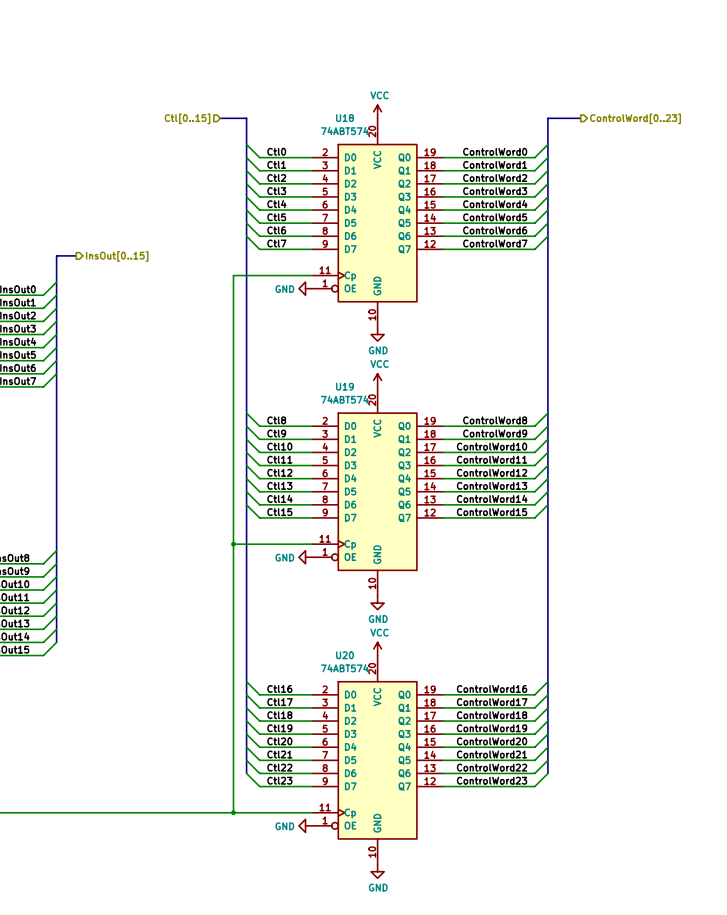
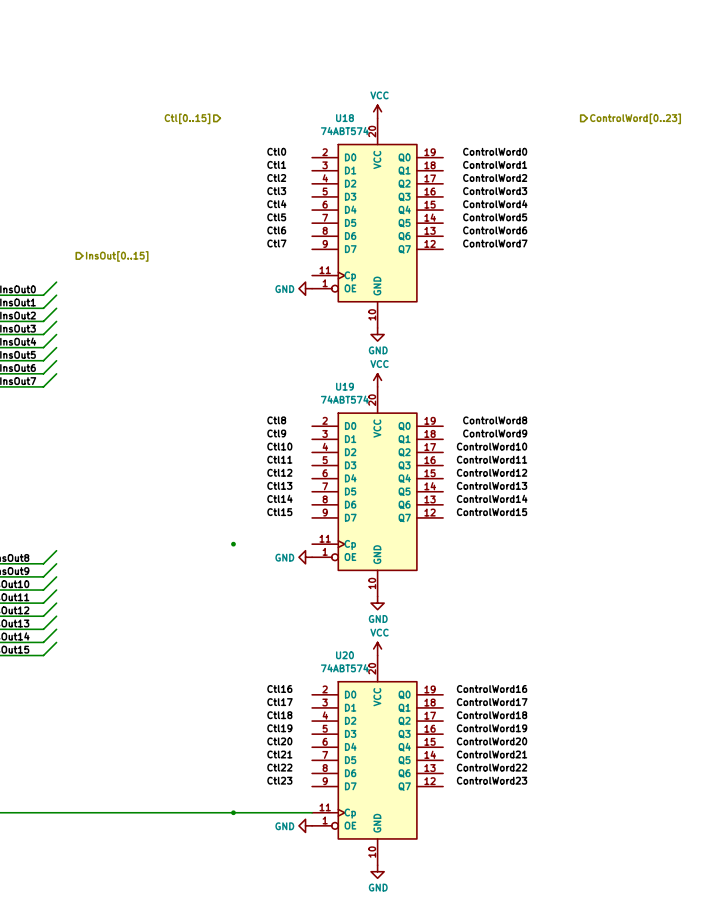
bus: (220, 118) (246, 118) (246, 773) -> none
bus: (580, 118) (547, 118) (547, 773) -> none
wire: (246, 144) (259, 157) (312, 157) -> none
wire: (547, 144) (534, 157) (443, 157) -> none
wire: (246, 157) (259, 170) (312, 170) -> none
wire: (547, 157) (534, 170) (443, 170) -> none
wire: (246, 170) (259, 183) (312, 183) -> none
wire: (547, 170) (534, 183) (443, 183) -> none
wire: (246, 183) (259, 196) (312, 196) -> none
wire: (547, 183) (534, 196) (443, 196) -> none
wire: (246, 196) (259, 210) (312, 210) -> none
wire: (547, 196) (534, 210) (443, 210) -> none
wire: (246, 210) (259, 223) (312, 223) -> none
wire: (547, 210) (534, 223) (443, 223) -> none
wire: (246, 223) (259, 236) (312, 236) -> none
wire: (547, 223) (534, 236) (443, 236) -> none
wire: (246, 236) (259, 249) (312, 249) -> none
wire: (547, 236) (534, 249) (443, 249) -> none
bus: (76, 255) (56, 255) (56, 642) -> none
wire: (312, 275) (233, 275) (233, 812) -> none
wire: (246, 413) (259, 426) (312, 426) -> none
wire: (547, 413) (534, 426) (443, 426) -> none
wire: (246, 426) (259, 439) (312, 439) -> none
wire: (547, 426) (534, 439) (443, 439) -> none
wire: (246, 439) (259, 452) (312, 452) -> none
wire: (547, 439) (534, 452) (443, 452) -> none
wire: (246, 452) (259, 465) (312, 465) -> none
wire: (547, 452) (534, 465) (443, 465) -> none
wire: (246, 465) (259, 478) (312, 478) -> none
wire: (547, 465) (534, 478) (443, 478) -> none
wire: (246, 478) (259, 491) (312, 491) -> none
wire: (547, 478) (534, 491) (443, 491) -> none
wire: (246, 491) (259, 504) (312, 504) -> none
wire: (547, 491) (534, 504) (443, 504) -> none
wire: (246, 504) (259, 517) (312, 517) -> none
wire: (547, 504) (534, 517) (443, 517) -> none
wire: (233, 544) (312, 544) -> none
wire: (246, 681) (259, 694) (312, 694) -> none
wire: (547, 681) (534, 694) (443, 694) -> none
wire: (246, 694) (259, 707) (312, 707) -> none
wire: (547, 694) (534, 707) (443, 707) -> none
wire: (246, 707) (259, 721) (312, 721) -> none
wire: (547, 707) (534, 721) (443, 721) -> none
wire: (246, 721) (259, 734) (312, 734) -> none
wire: (547, 721) (534, 734) (443, 734) -> none
wire: (246, 734) (259, 747) (312, 747) -> none
wire: (547, 734) (534, 747) (443, 747) -> none
wire: (246, 747) (259, 760) (312, 760) -> none
wire: (547, 747) (534, 760) (443, 760) -> none
wire: (246, 760) (259, 773) (312, 773) -> none
wire: (547, 760) (534, 773) (443, 773) -> none
wire: (246, 773) (259, 786) (312, 786) -> none
wire: (547, 773) (534, 786) (443, 786) -> none

